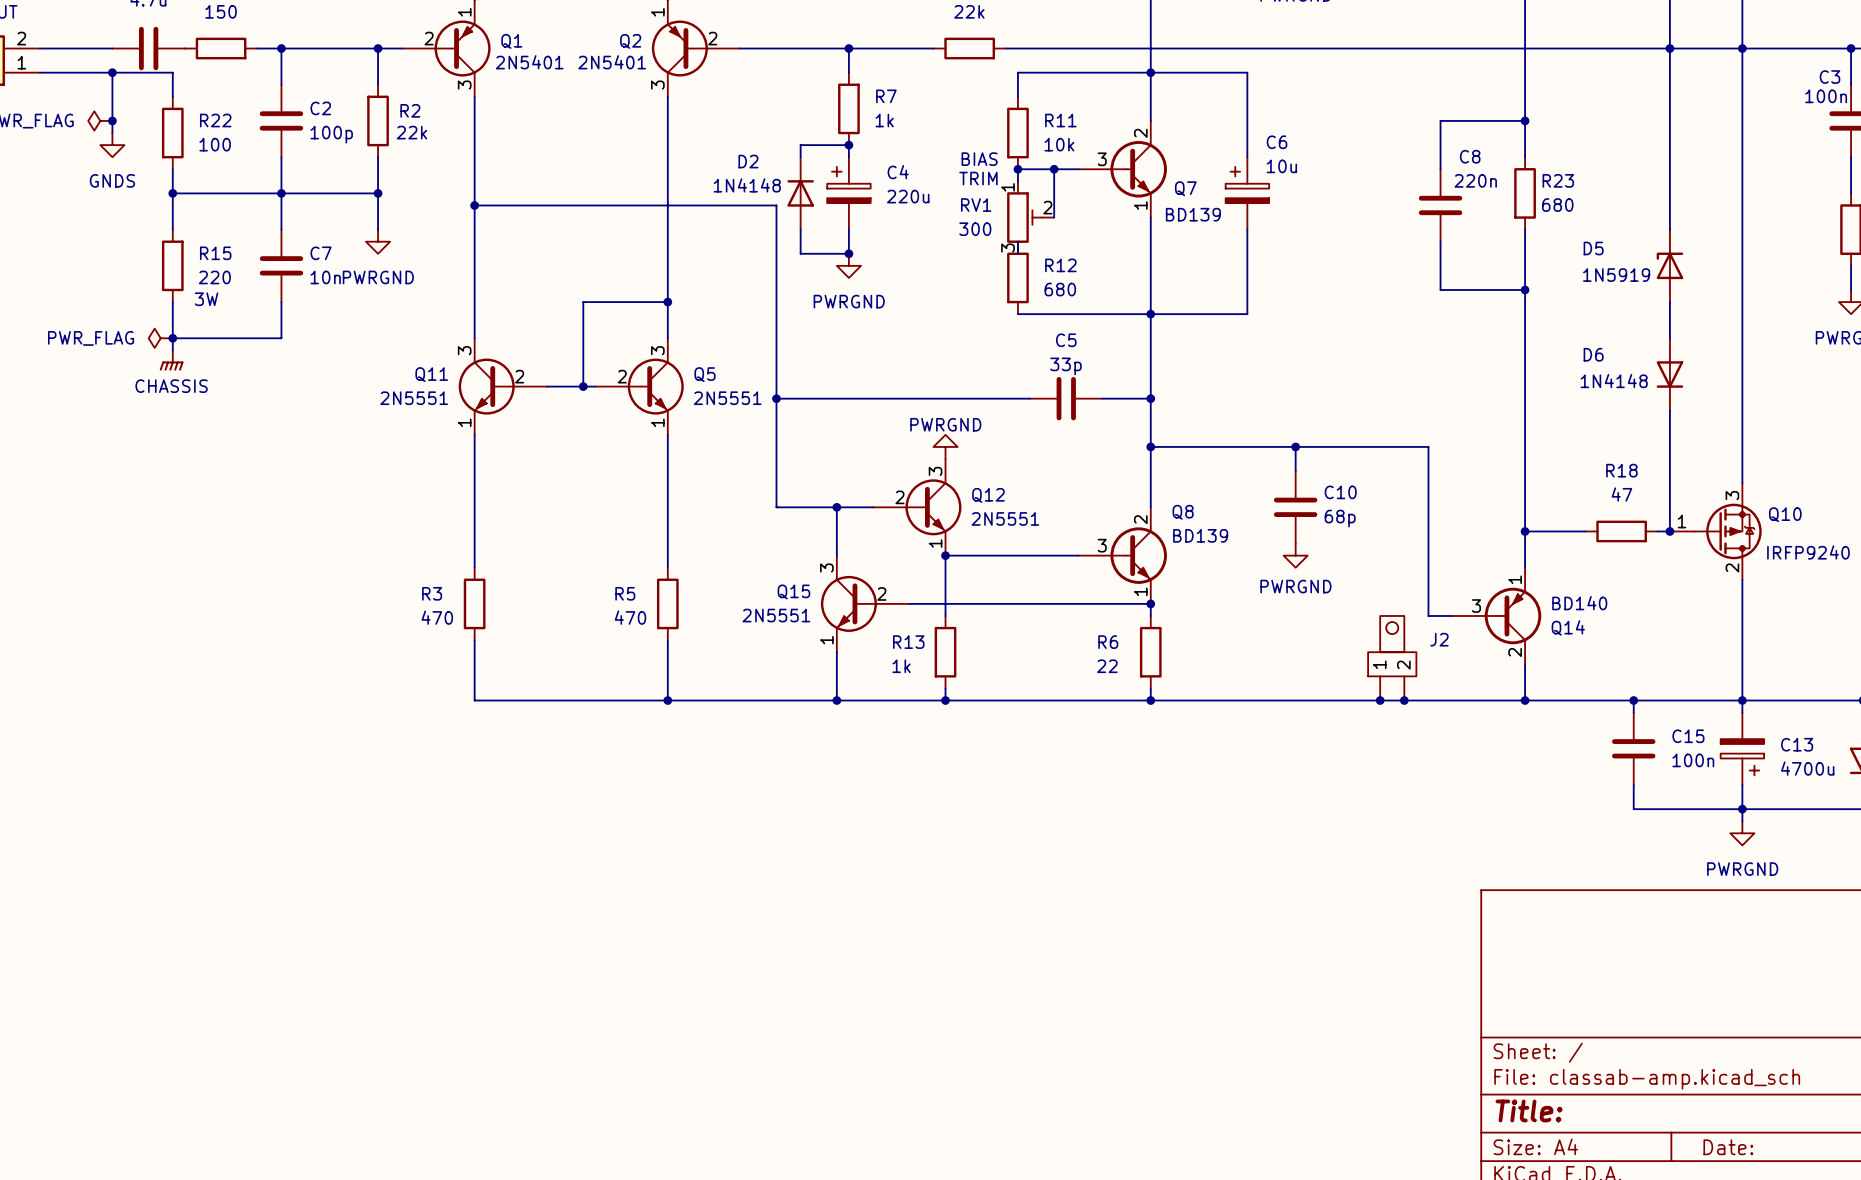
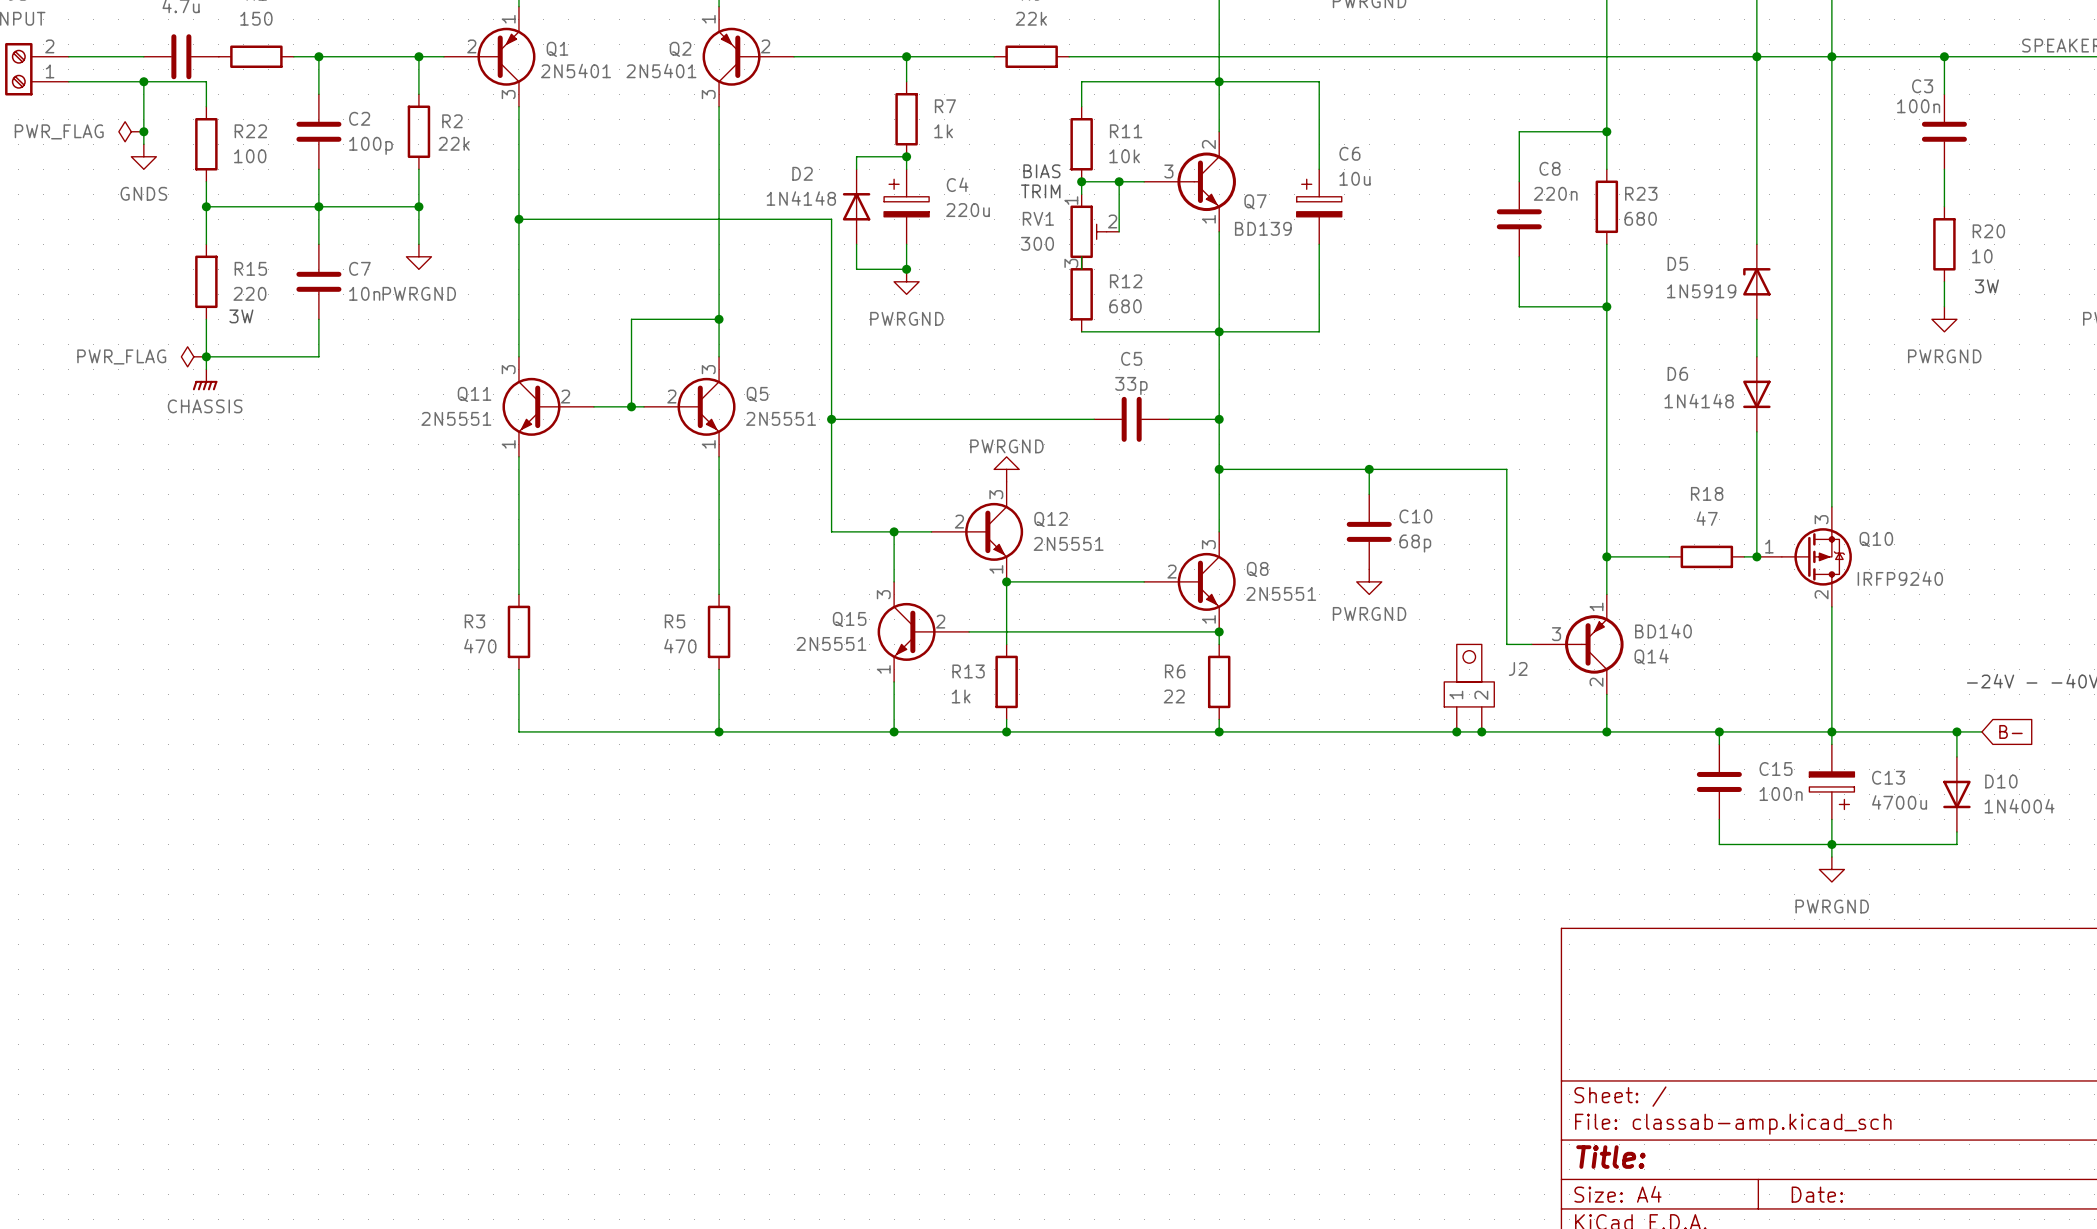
Q8 symbol: [1078, 507, 1167, 604] -> [1144, 531, 1236, 632]
Q8 name position: Q8 (1183, 512) -> Q8 (1257, 569)
Q8 value: BD139 (1200, 535) -> 2N5551 (1281, 593)

